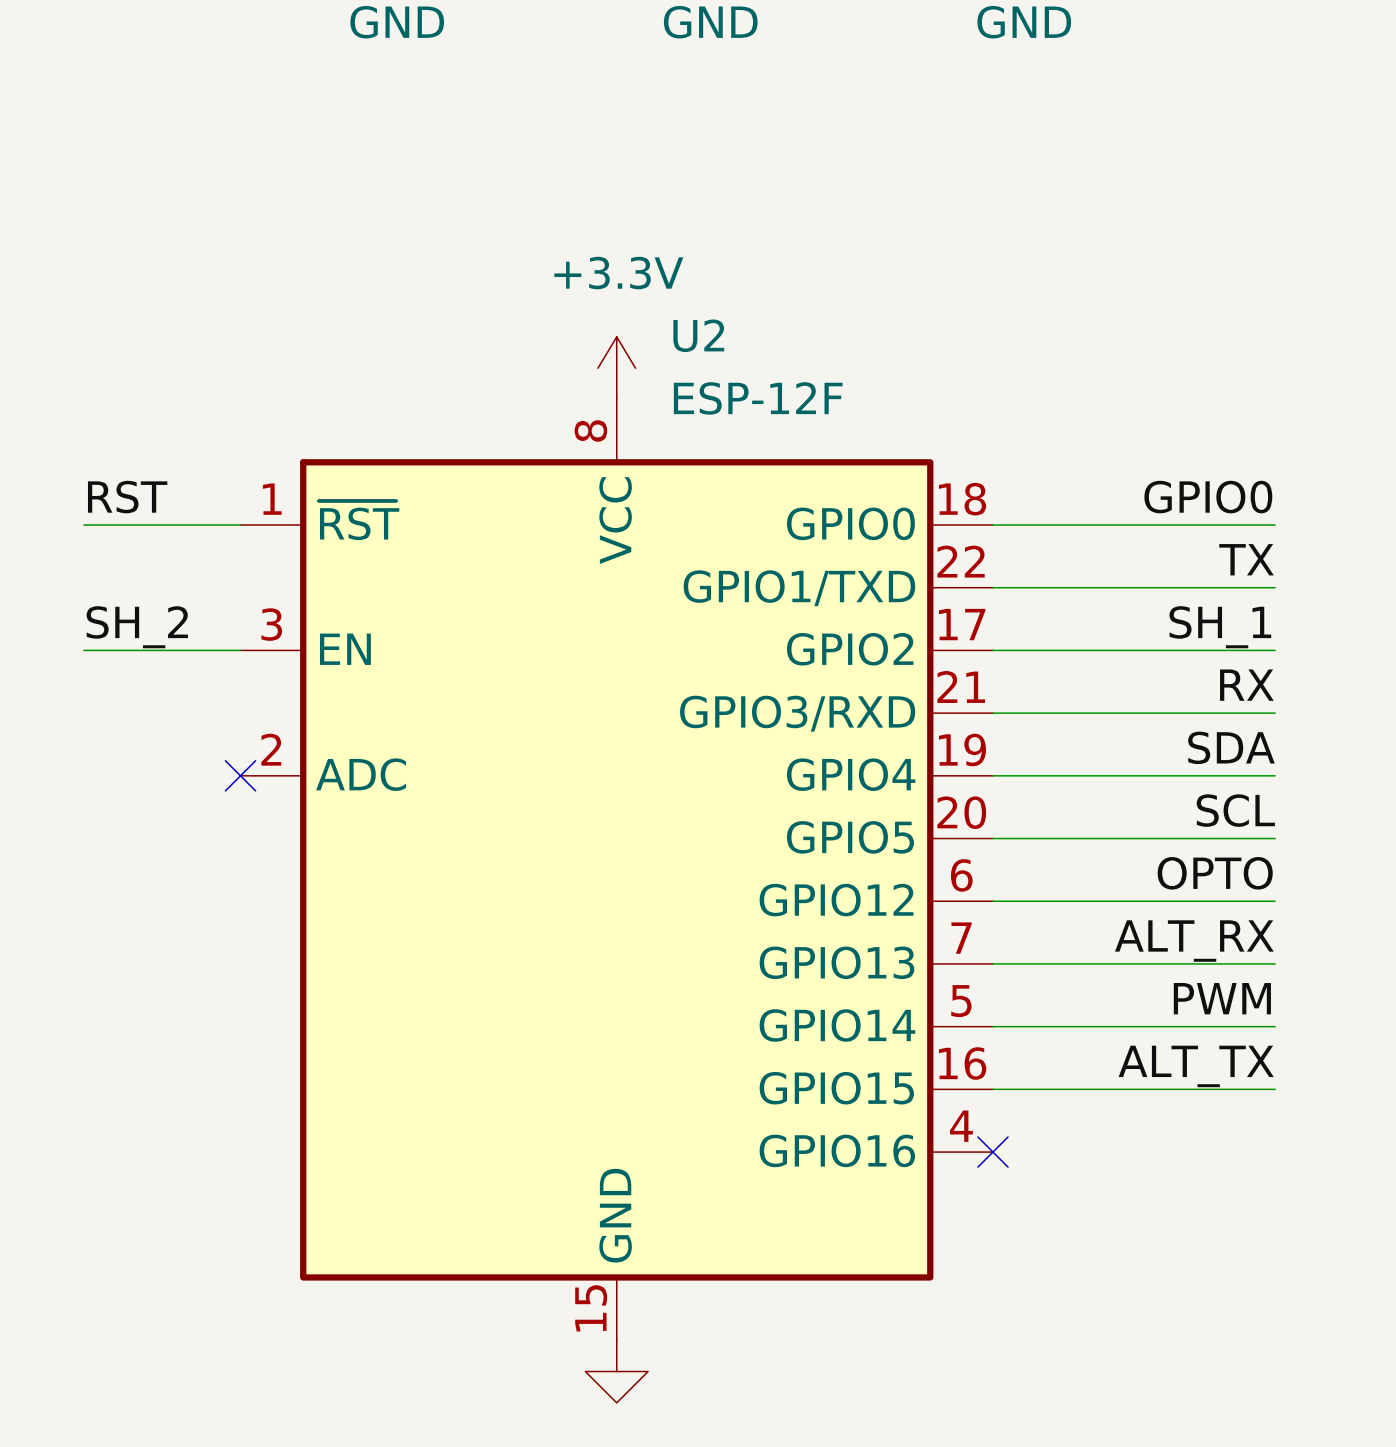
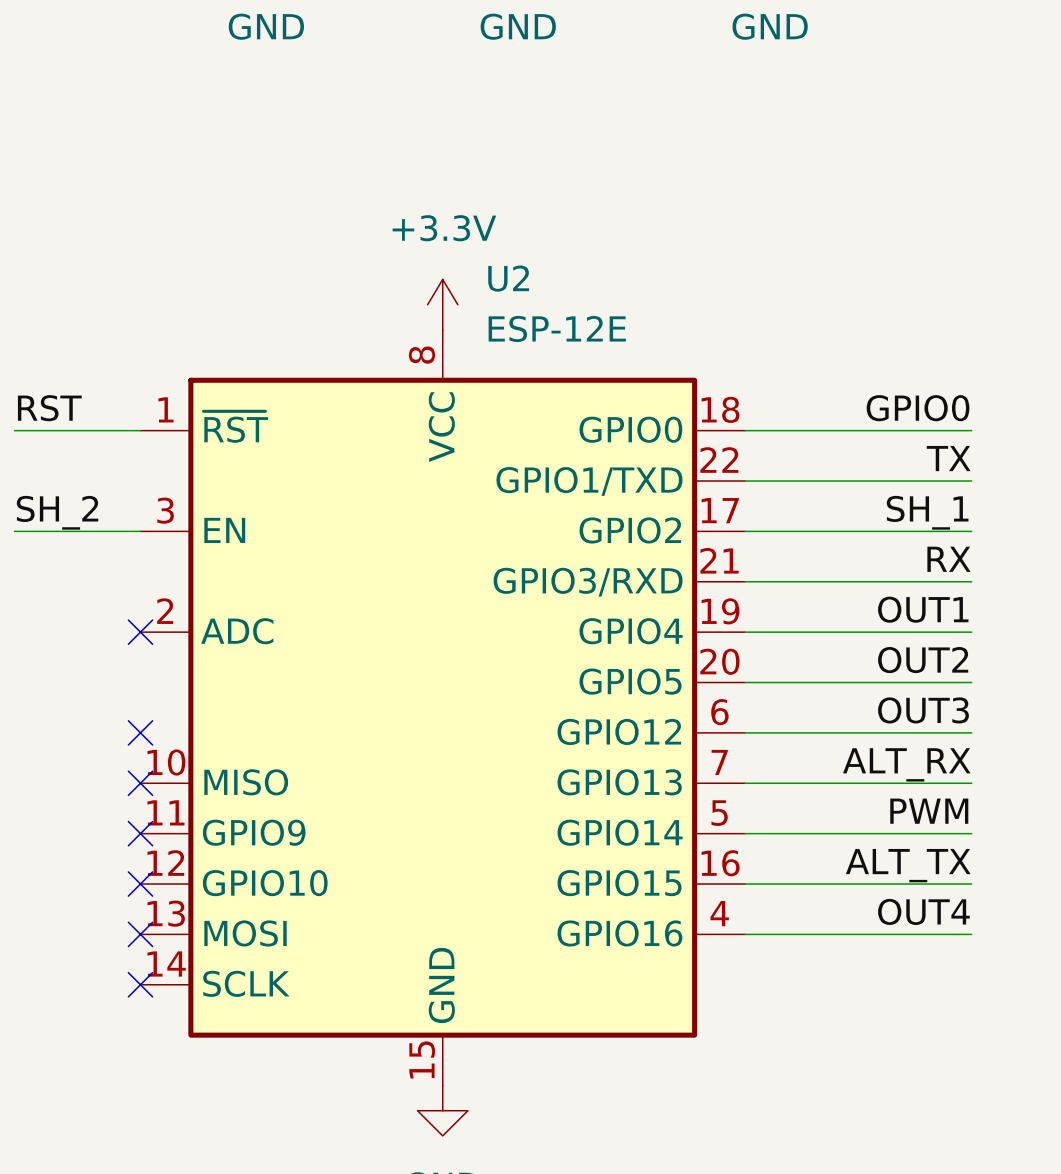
U2 value: ESP-12F (758, 398) -> ESP-12E (557, 328)
U2 symbol: [240, 399, 993, 1341] -> [140, 329, 745, 1086]
label: SDA (1231, 747) -> OUT1 (923, 609)
label: SCL (1235, 810) -> OUT2 (923, 660)
label: OPTO (1215, 873) -> OUT3 (923, 710)
no-connect mark: none -> (140, 732)
no-connect mark: none -> (140, 783)
no-connect mark: none -> (140, 833)
no-connect mark: none -> (140, 884)
label: none -> OUT4 (923, 911)
no-connect mark: none -> (140, 934)
wire: none -> (744, 934) (971, 934)
no-connect mark: (992, 1152) -> none
no-connect mark: none -> (140, 984)

